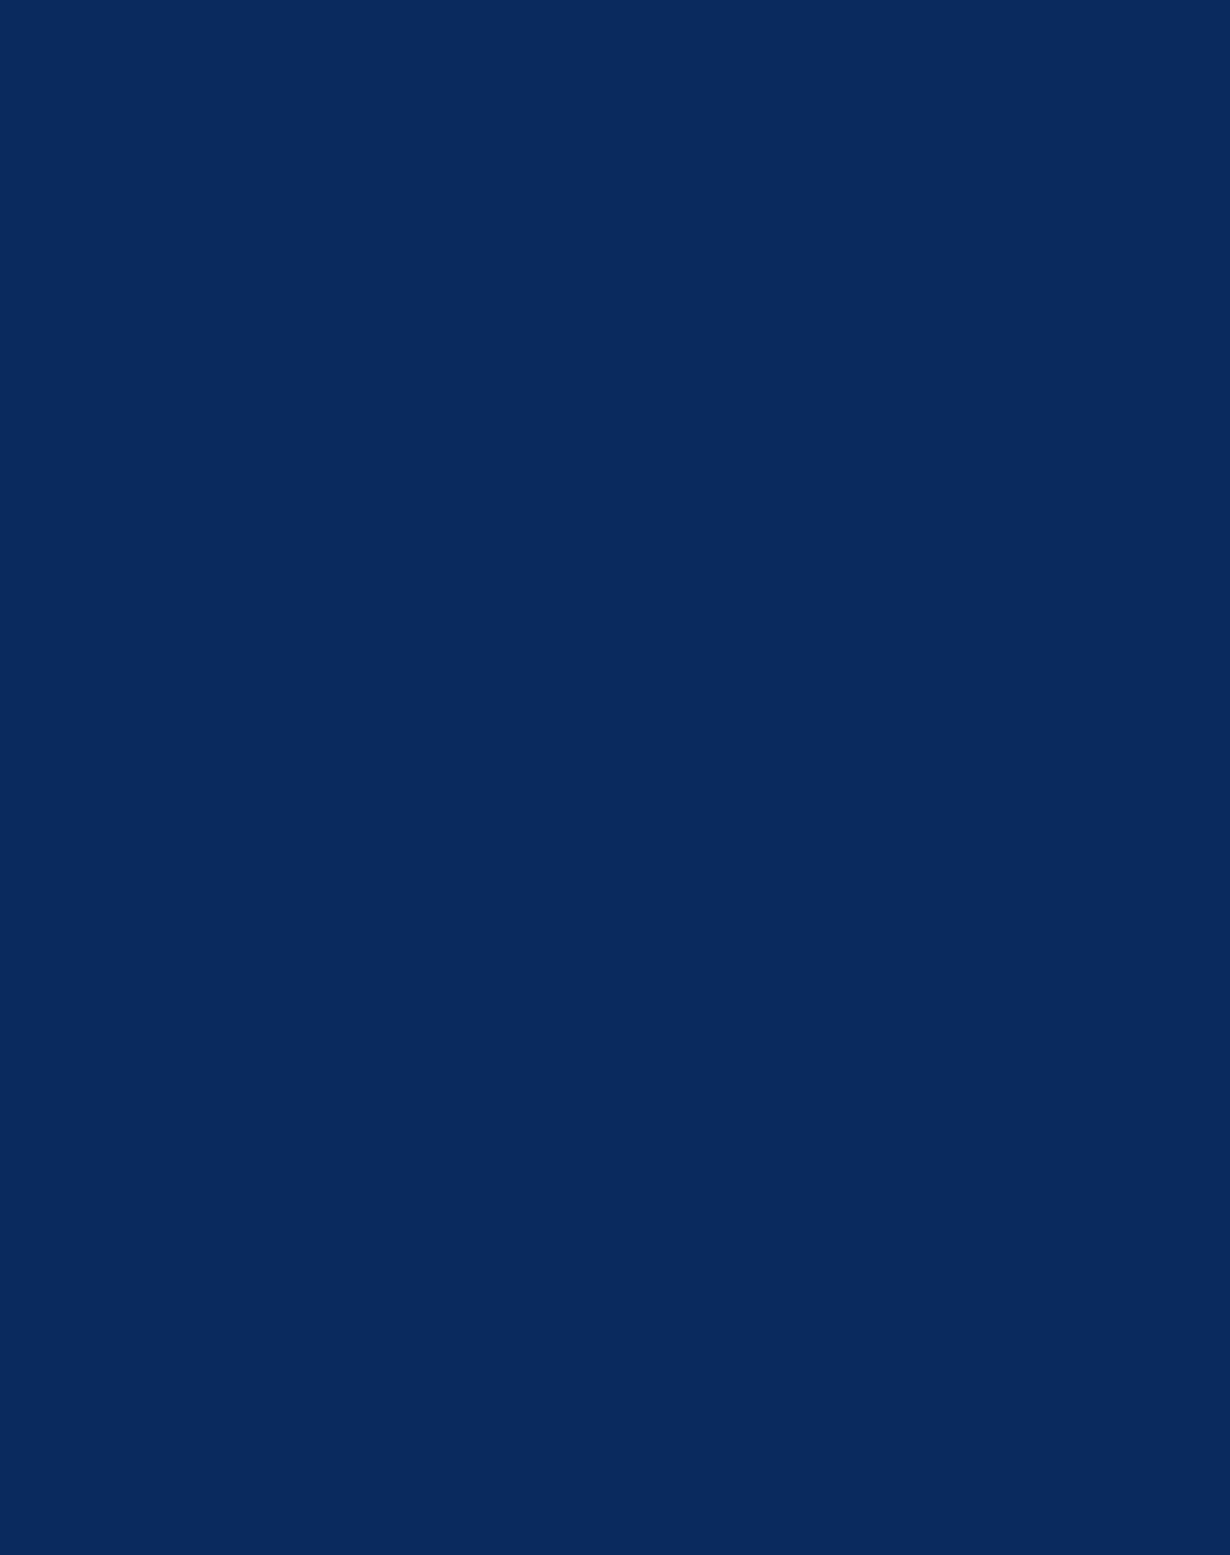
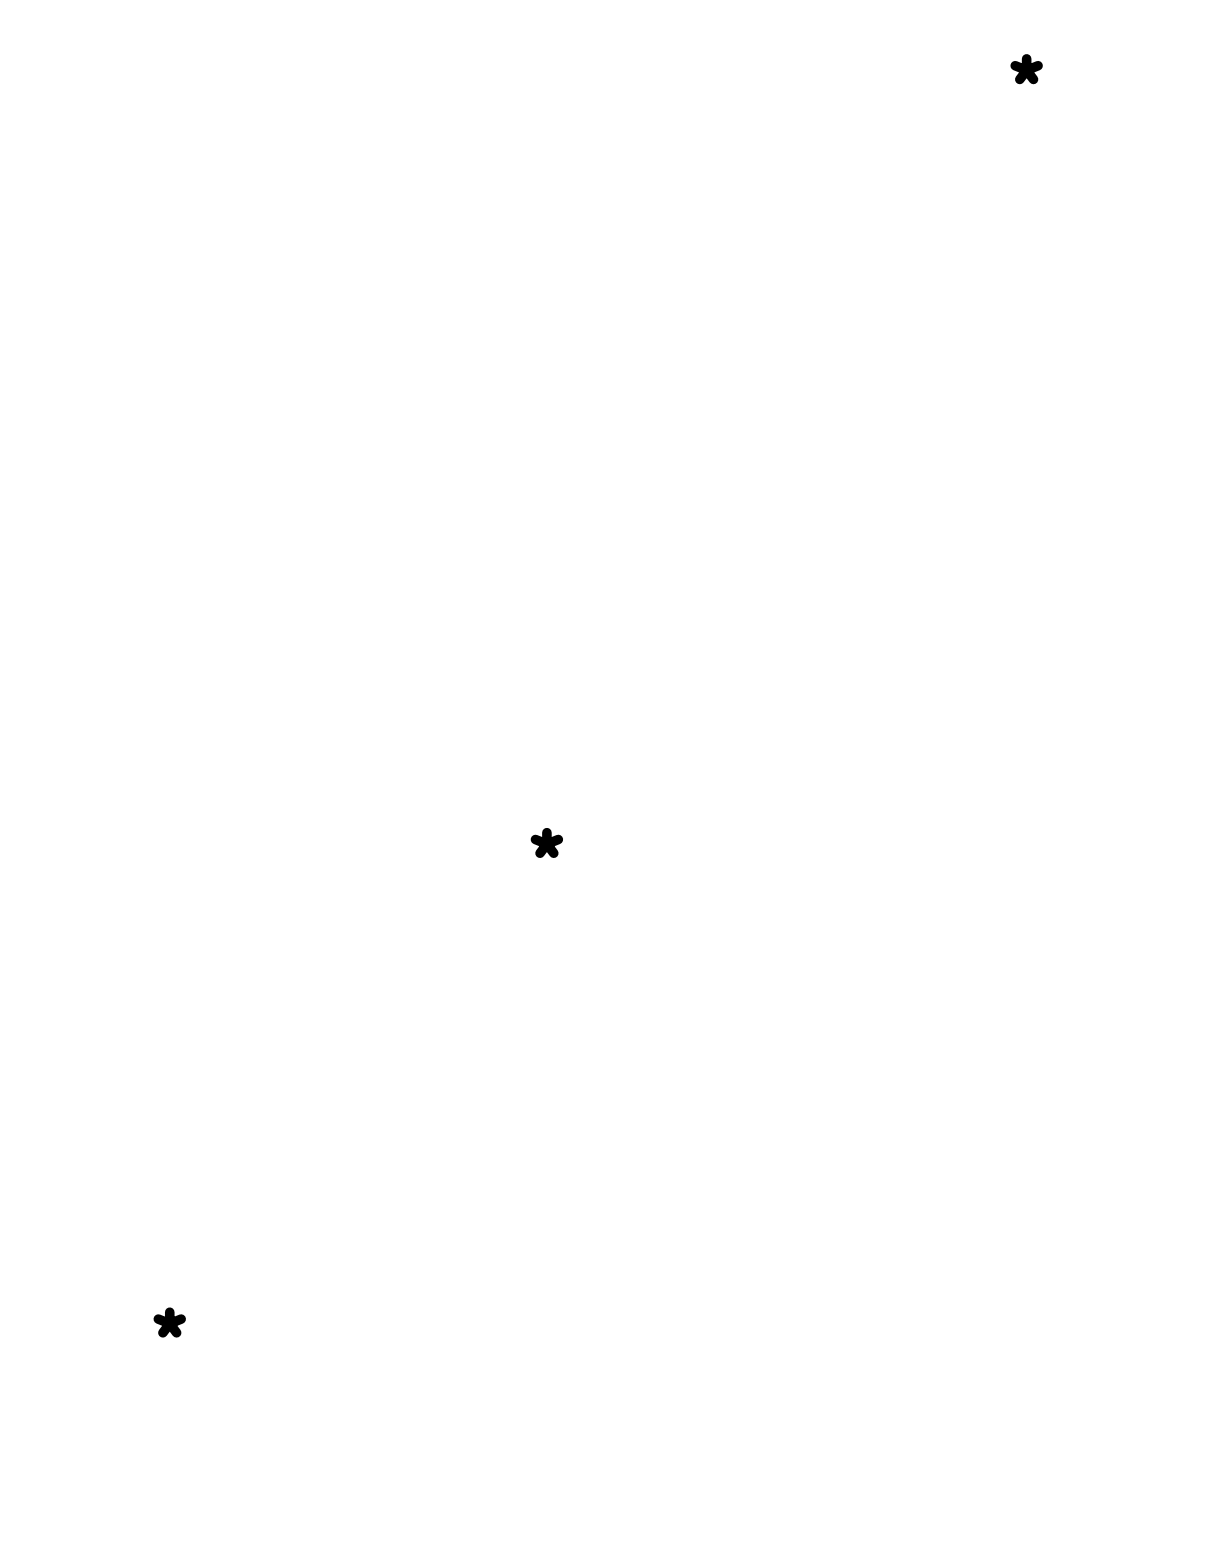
text: none -> * (1026, 69)
text: none -> * (546, 842)
text: none -> * (169, 1322)

